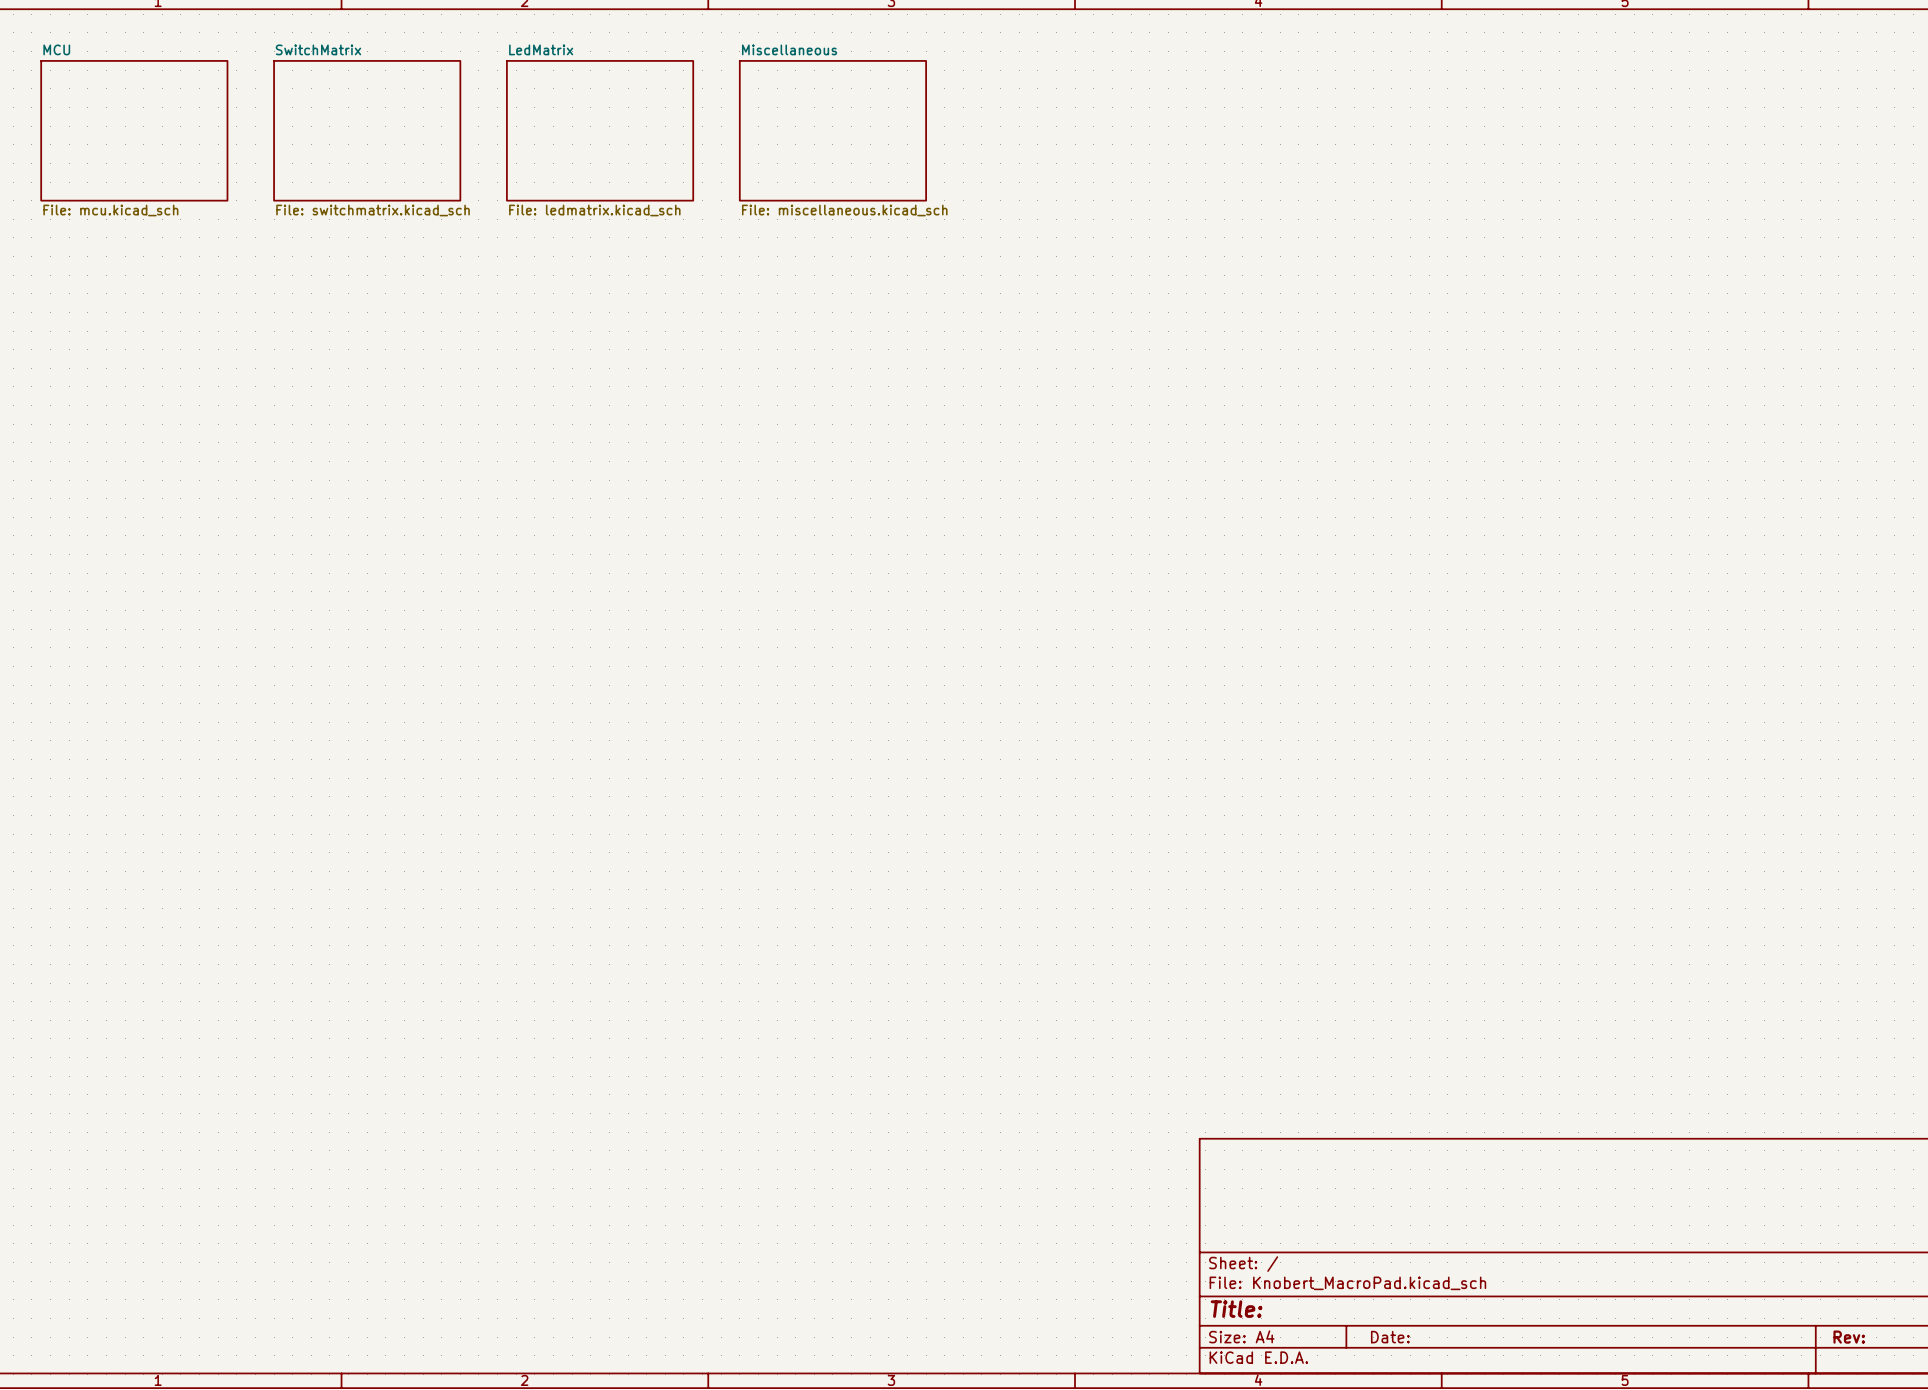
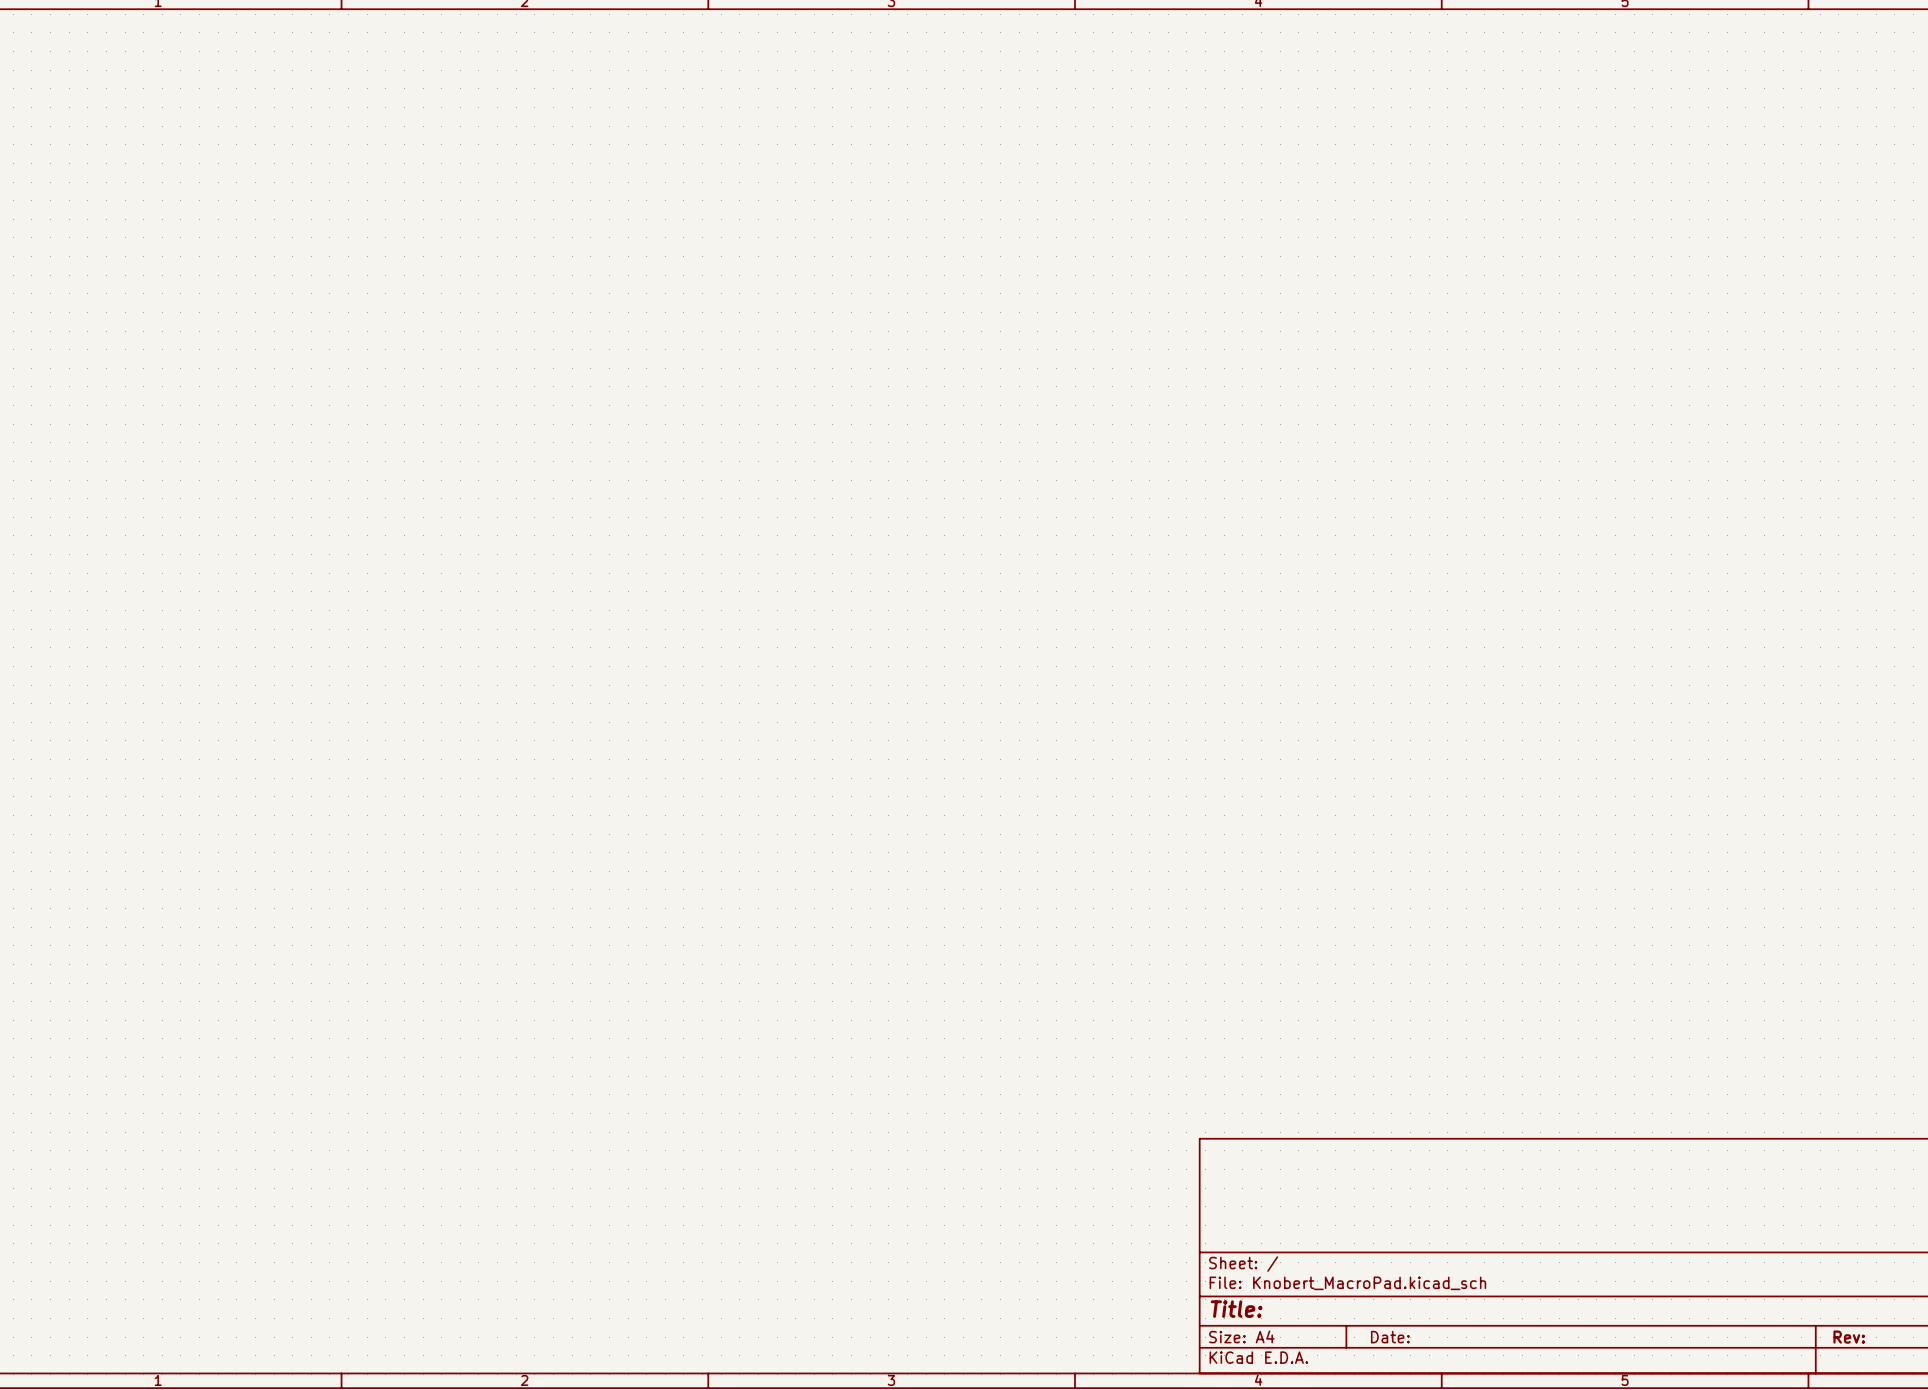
sheet MCU: File: mcu.kicad_sch (134, 130) -> none
sheet SwitchMatrix: File: switchmatrix.kicad_sch (367, 130) -> none
sheet LedMatrix: File: ledmatrix.kicad_sch (600, 130) -> none
sheet Miscellaneous: File: miscellaneous.kicad_sch (832, 130) -> none

